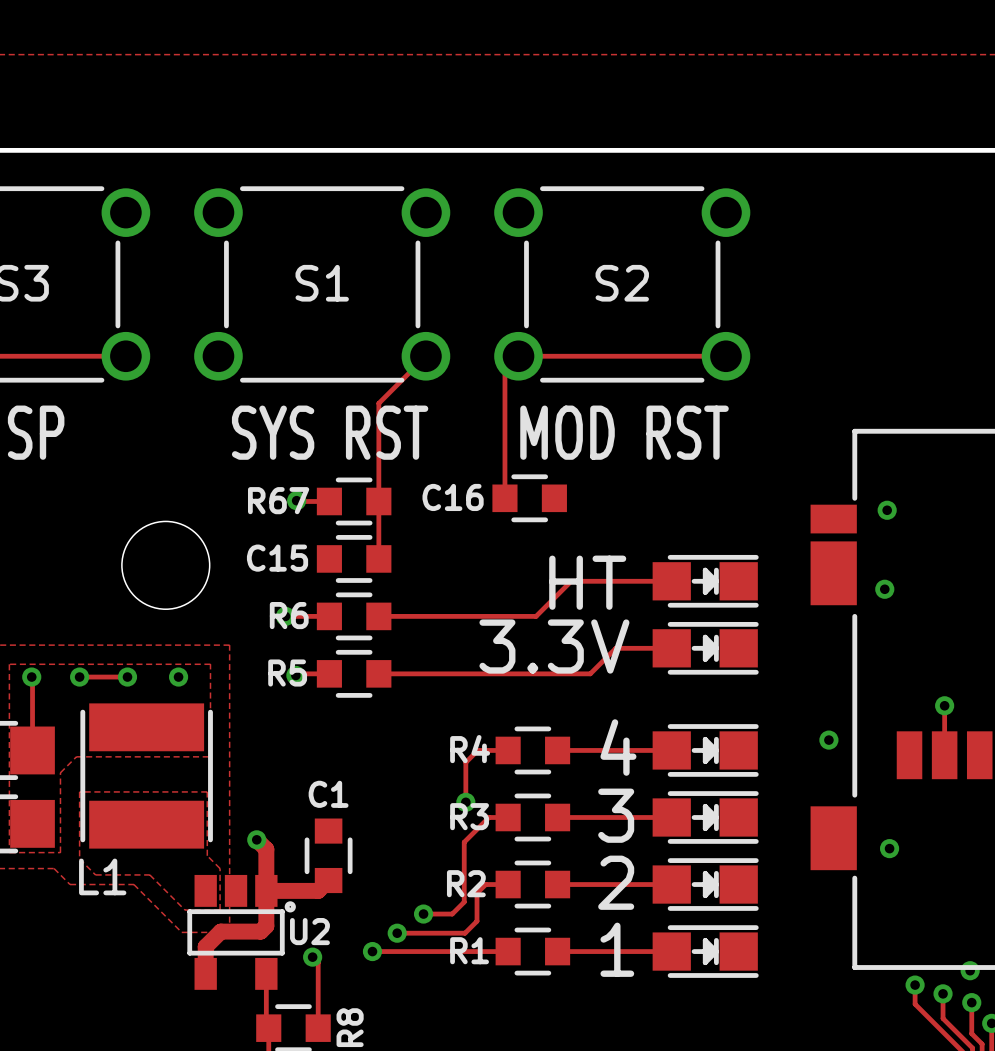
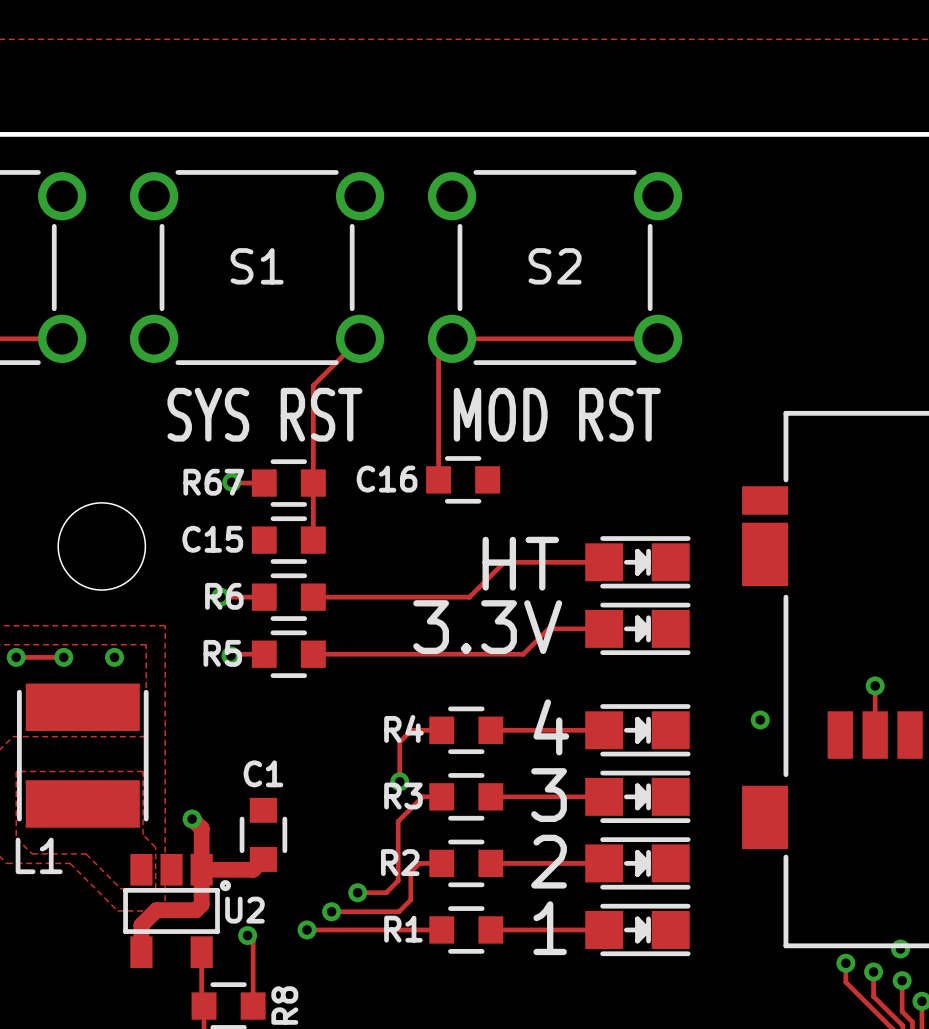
via: (887, 510) -> none
via: (884, 589) -> none
via: (889, 848) -> none

